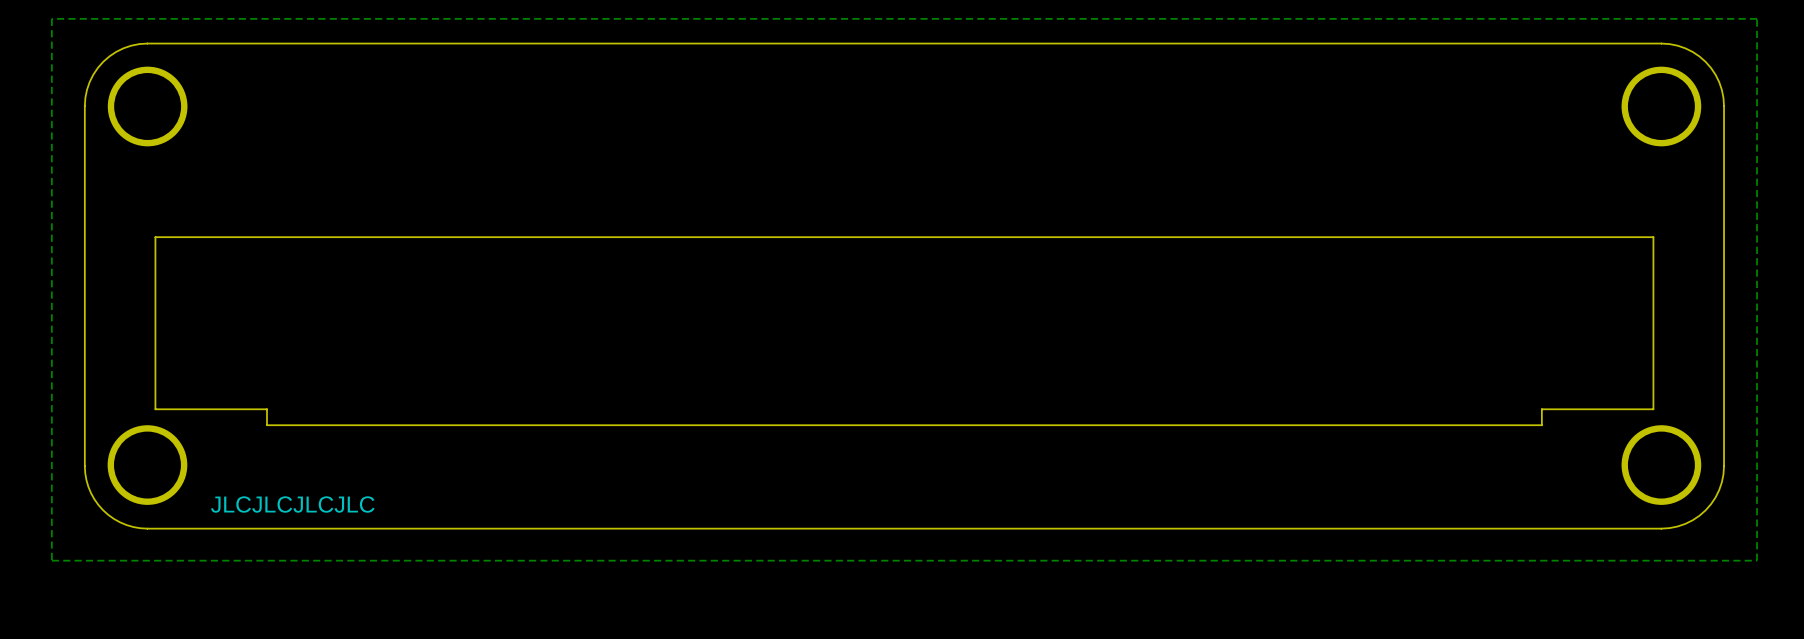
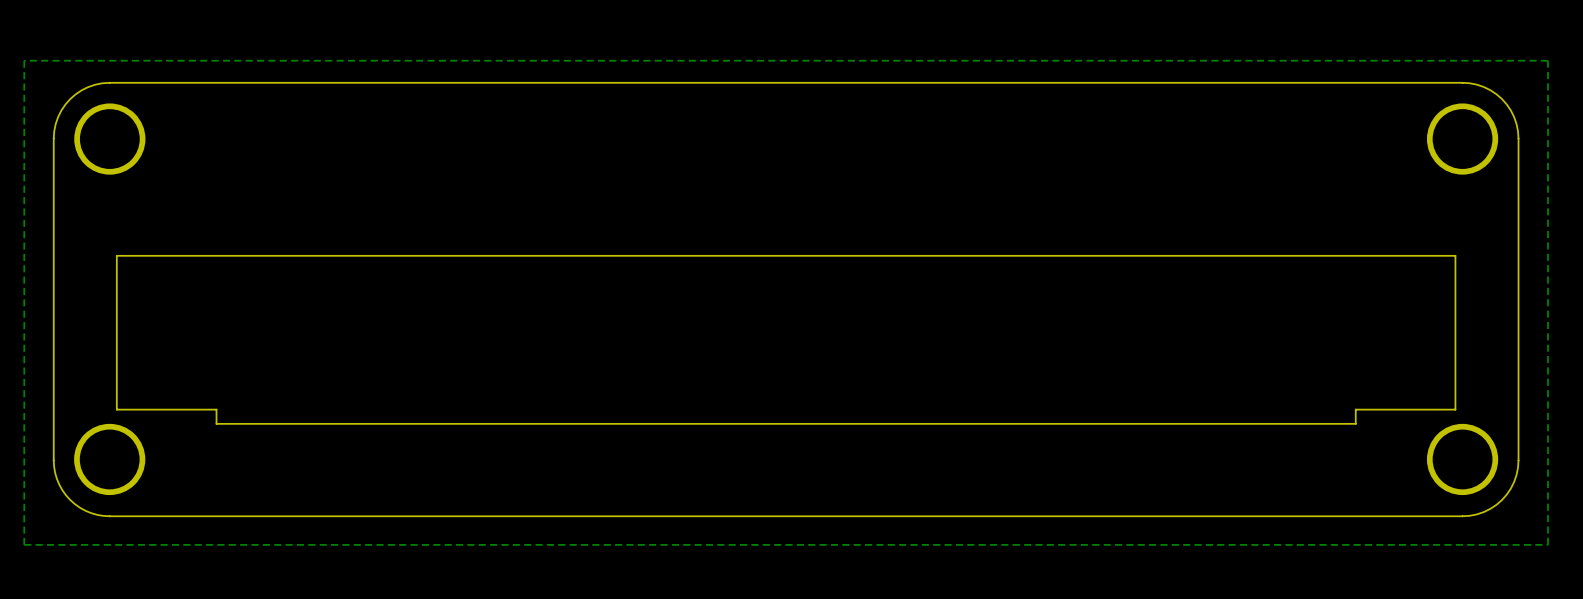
text: JLCJLCJLCJLC (292, 504) -> none

